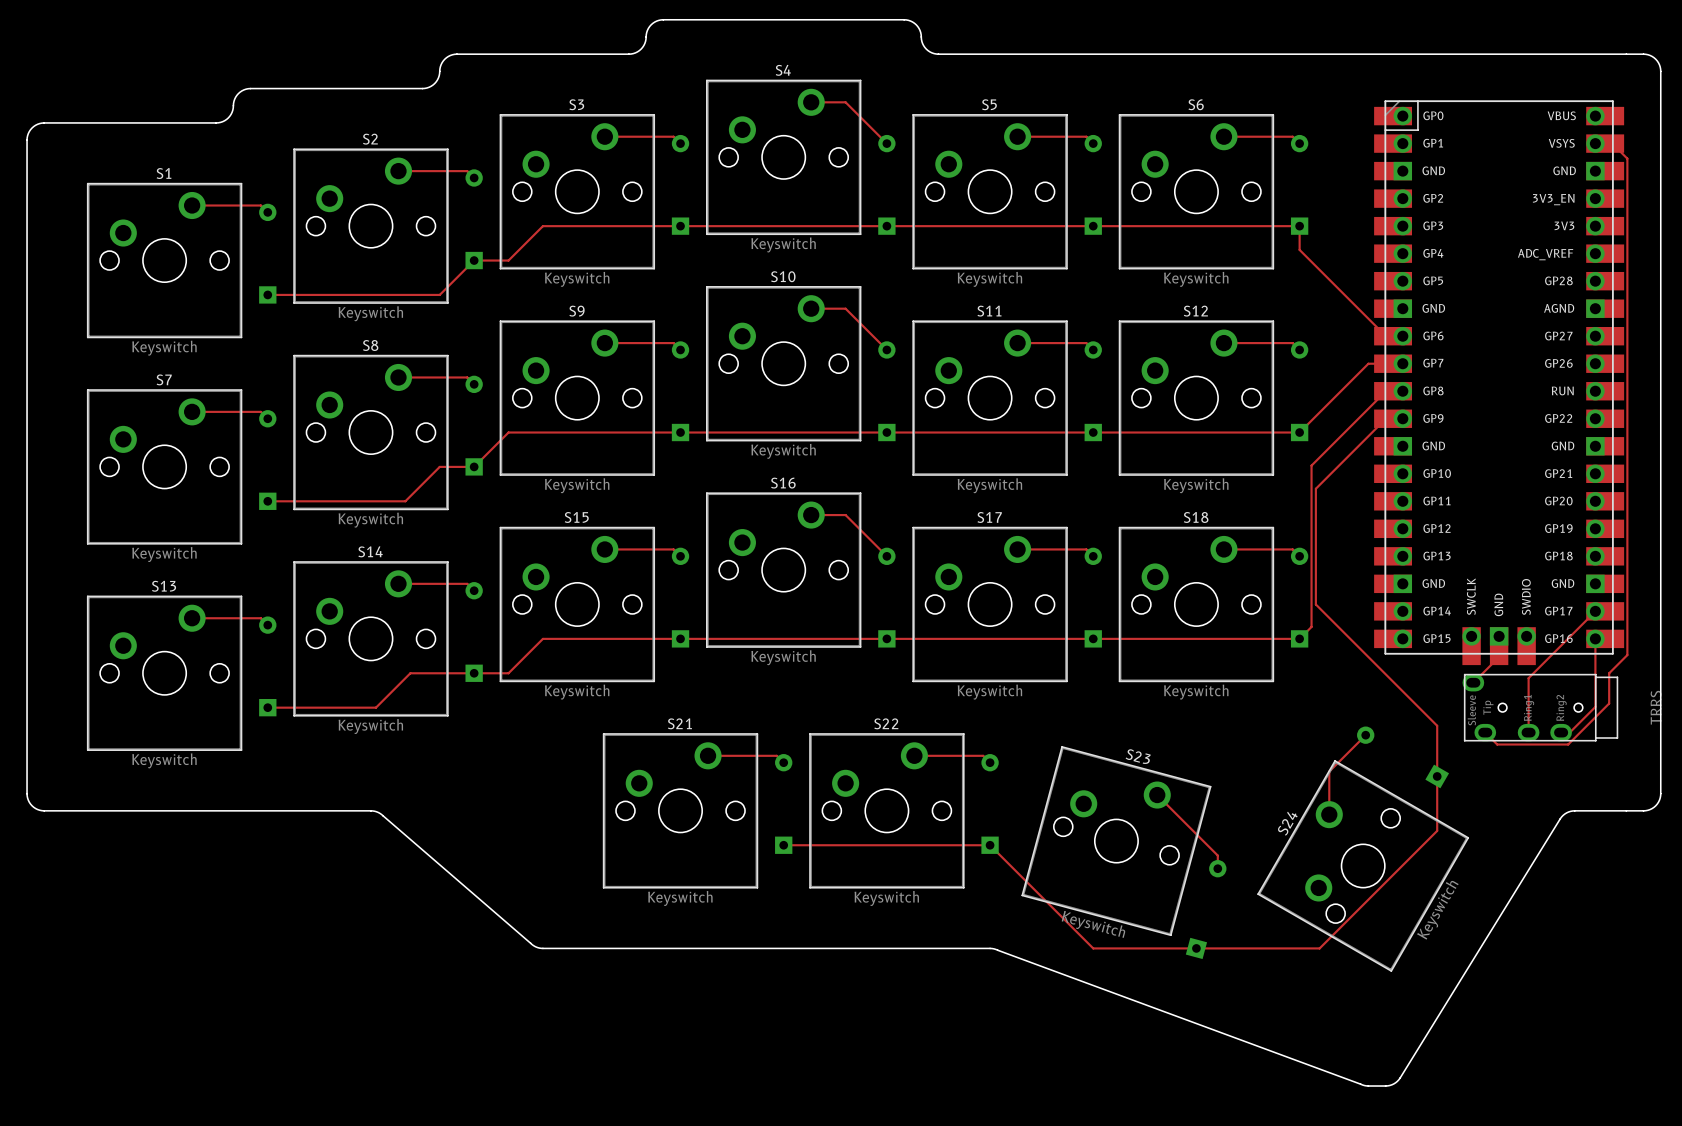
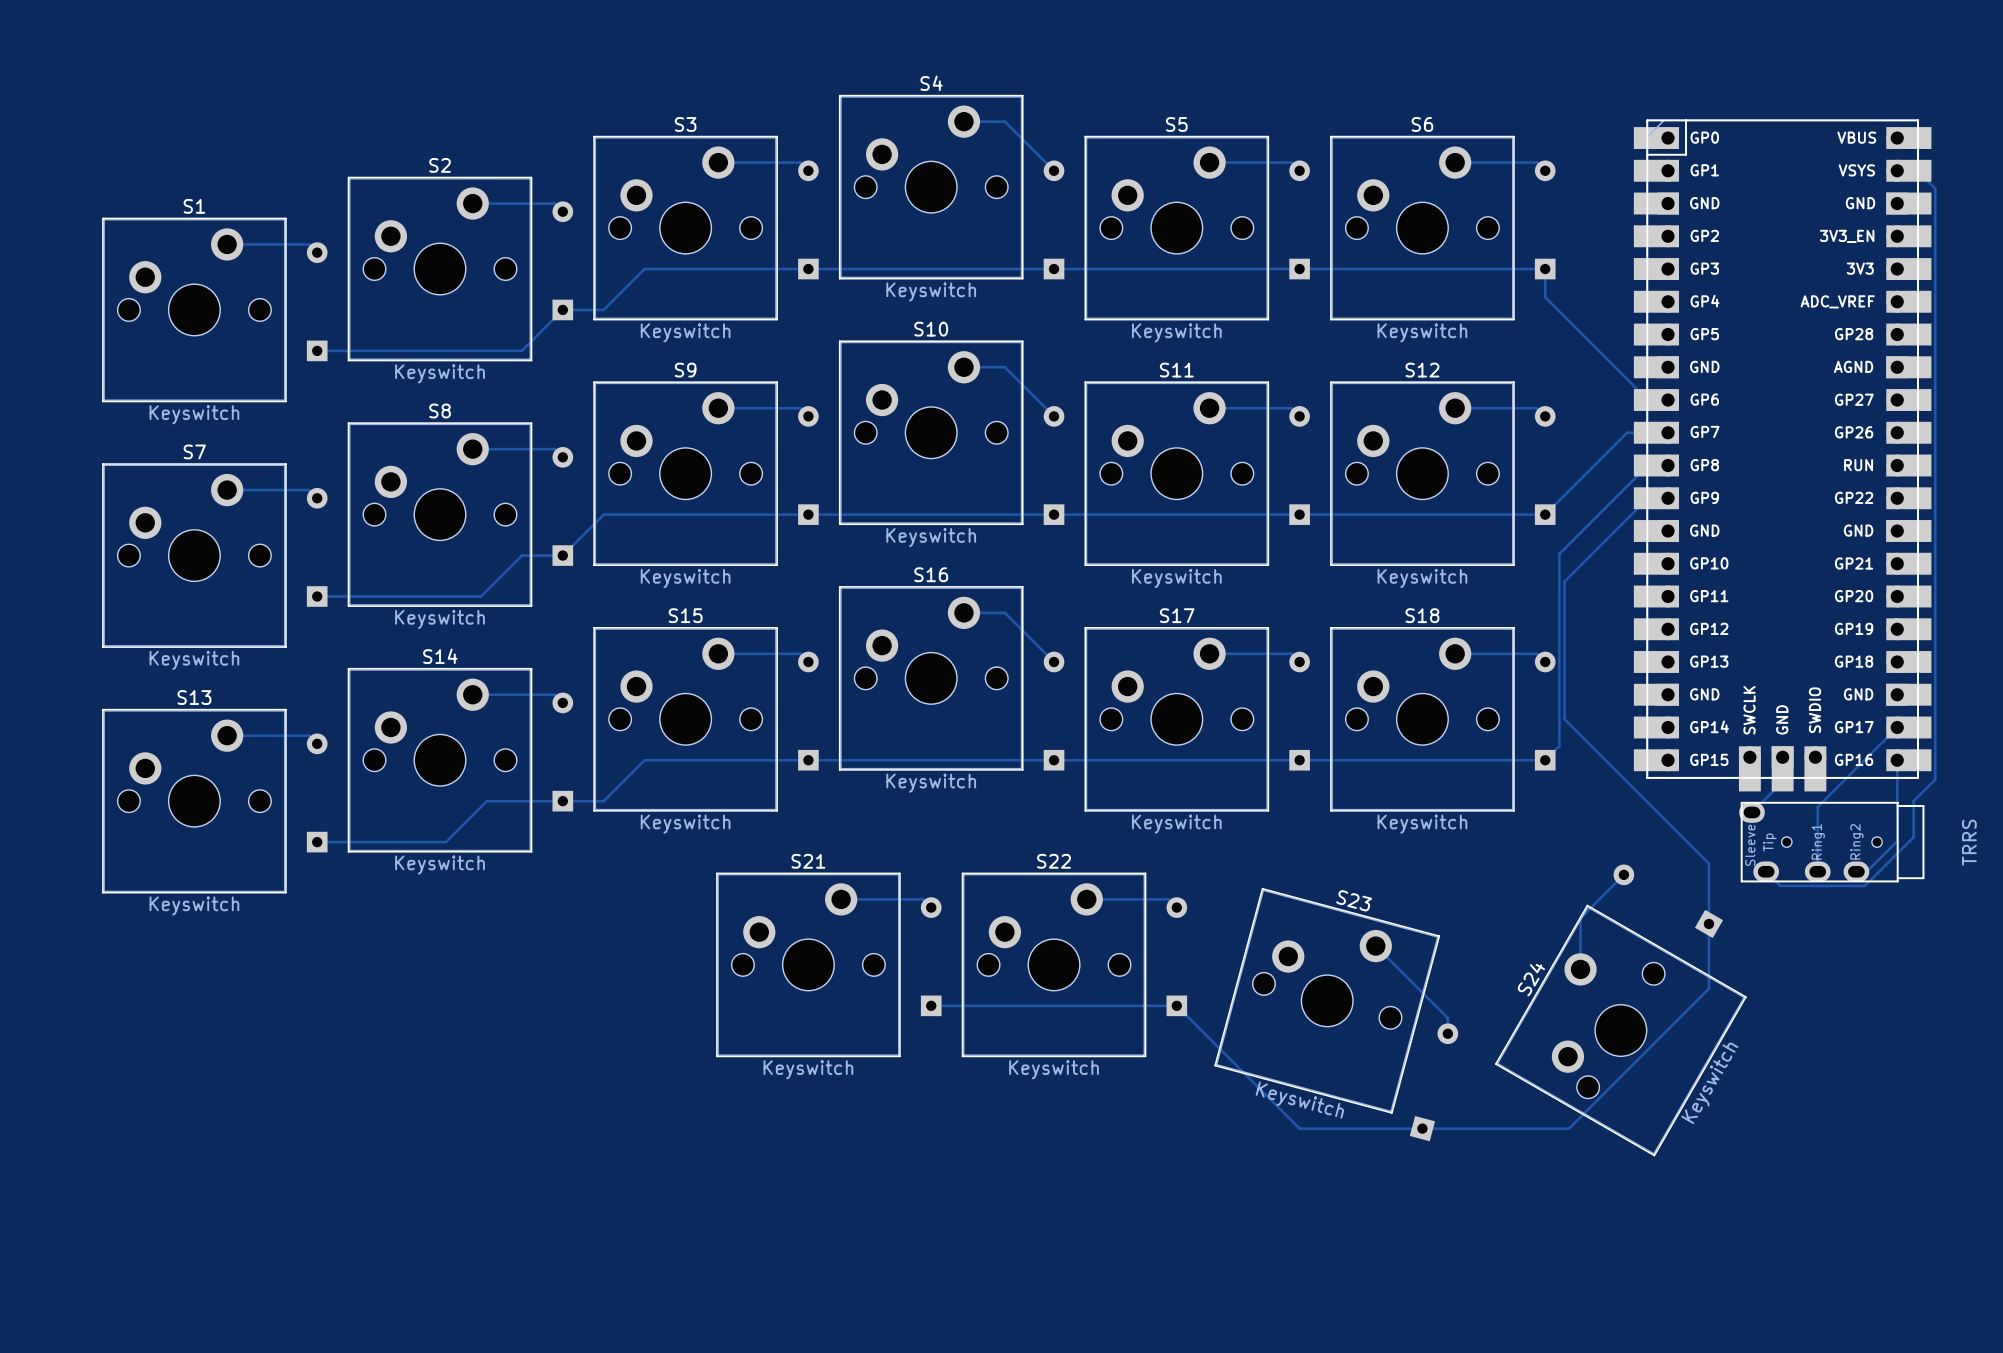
board edge: (663, 19) (906, 19) (917, 26) (922, 43) (926, 49) (938, 54) (1643, 54) (1652, 56) (1657, 60) (1660, 71) (1660, 798) (1654, 807) (1645, 810) (1572, 810) (1561, 817) (1395, 1082) (1387, 1085) (1362, 1084) (992, 948) (537, 947) (381, 814) (374, 811) (44, 810) (35, 808) (30, 804) (27, 793) (27, 140) (30, 129) (37, 124) (44, 122) (218, 122) (229, 116) (234, 99) (238, 93) (248, 88) (424, 88) (436, 81) (443, 60) (454, 54) (631, 54) (642, 47) (647, 30) (651, 24) (663, 19) -> none

